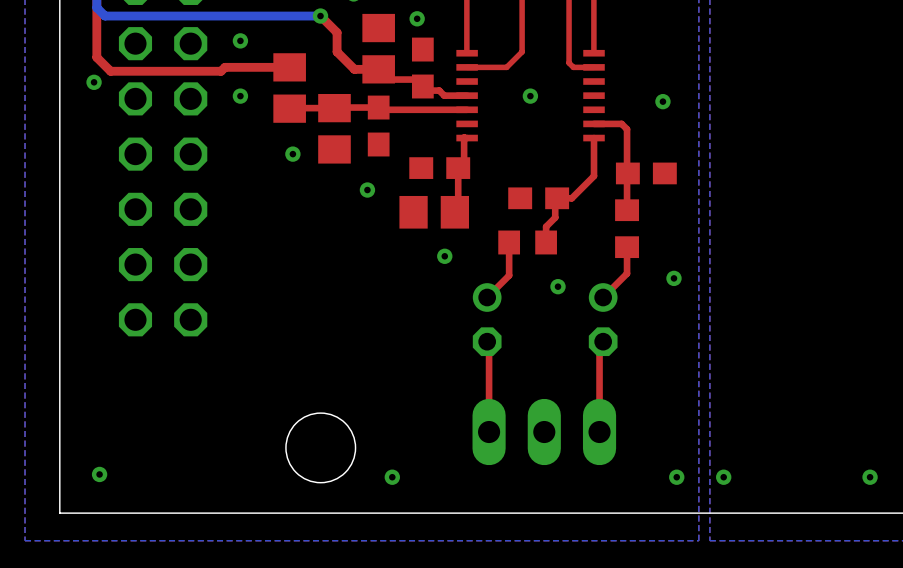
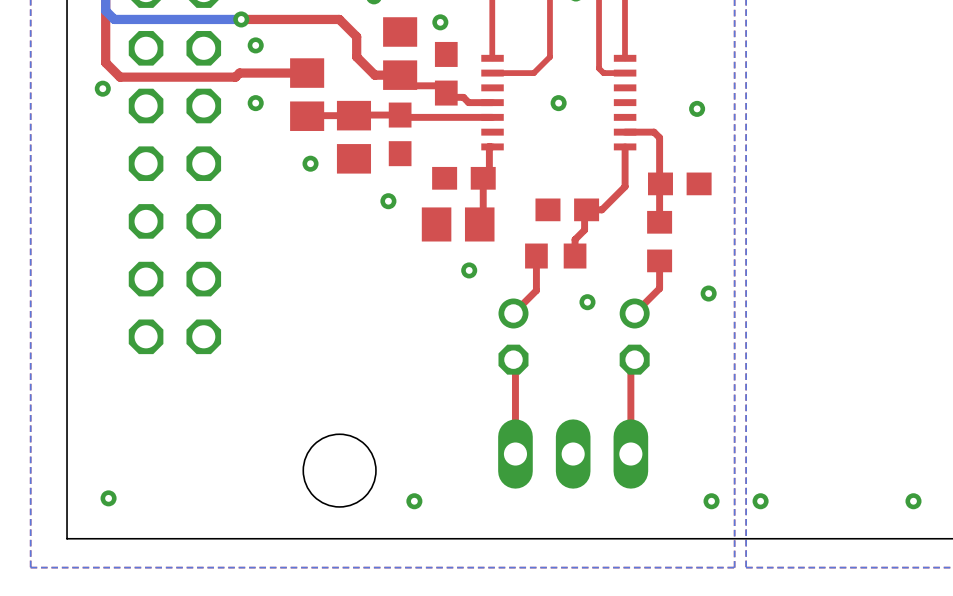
via: none -> (241, 19)
top track: none -> (339, 19) (241, 19)
bottom track: (320, 16) (226, 16) -> none
via: (320, 16) -> none

